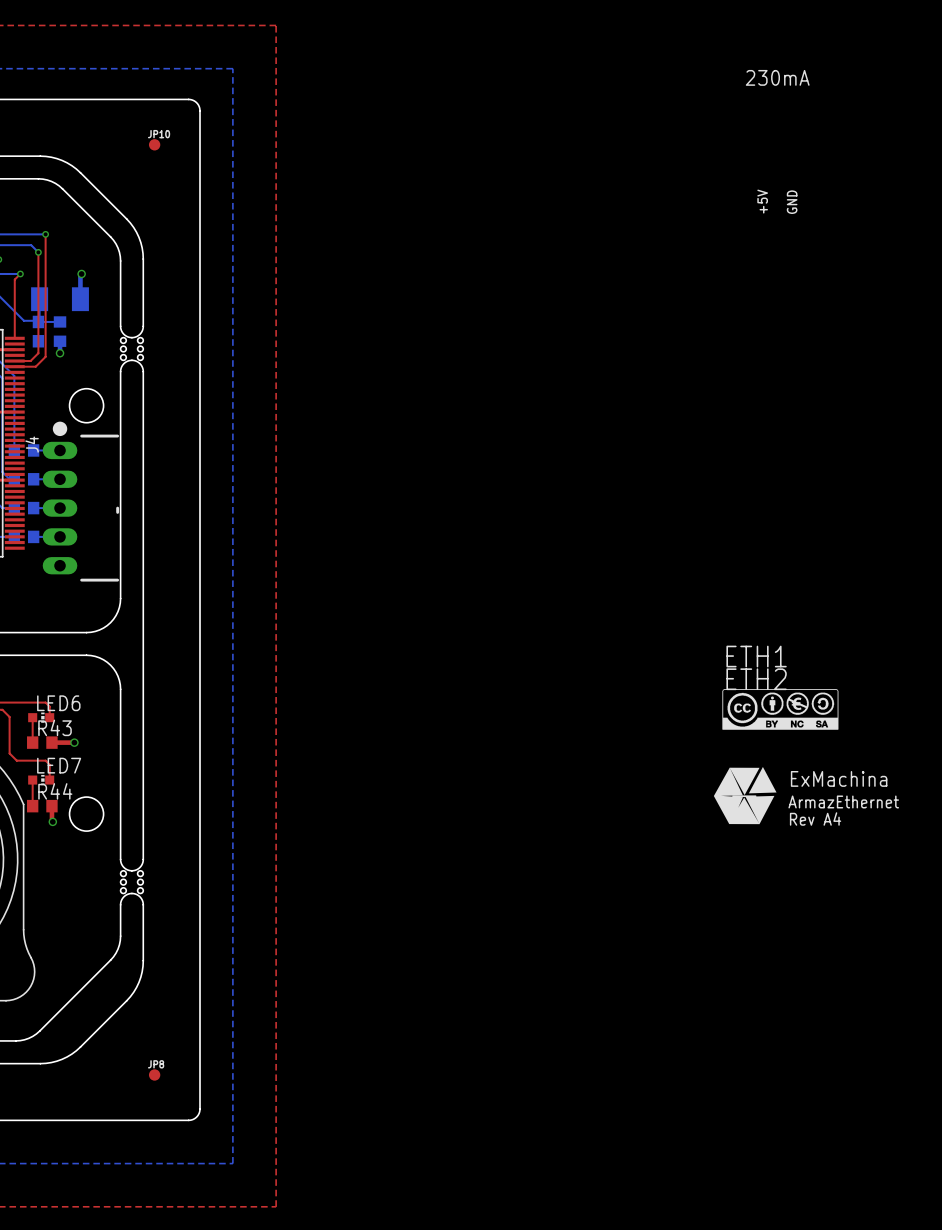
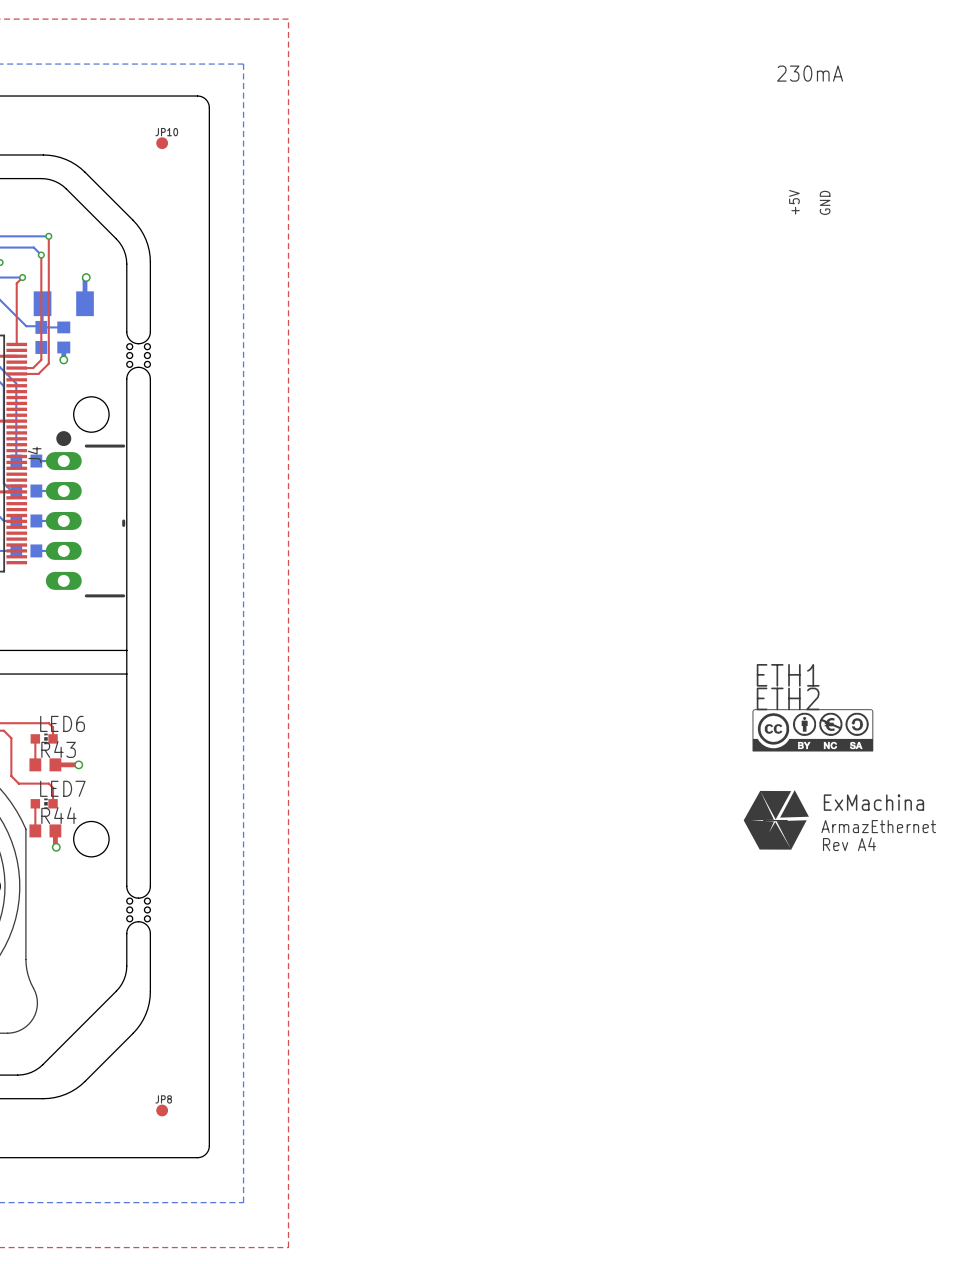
board edge: (120, 598) (118, 611) (110, 622) (99, 629) (86, 632) -> (126, 650) (91, 650)
board edge: none -> (126, 615) (126, 709)
board edge: (86, 655) (99, 657) (110, 665) (118, 676) (120, 689) -> (91, 674) (126, 674)

